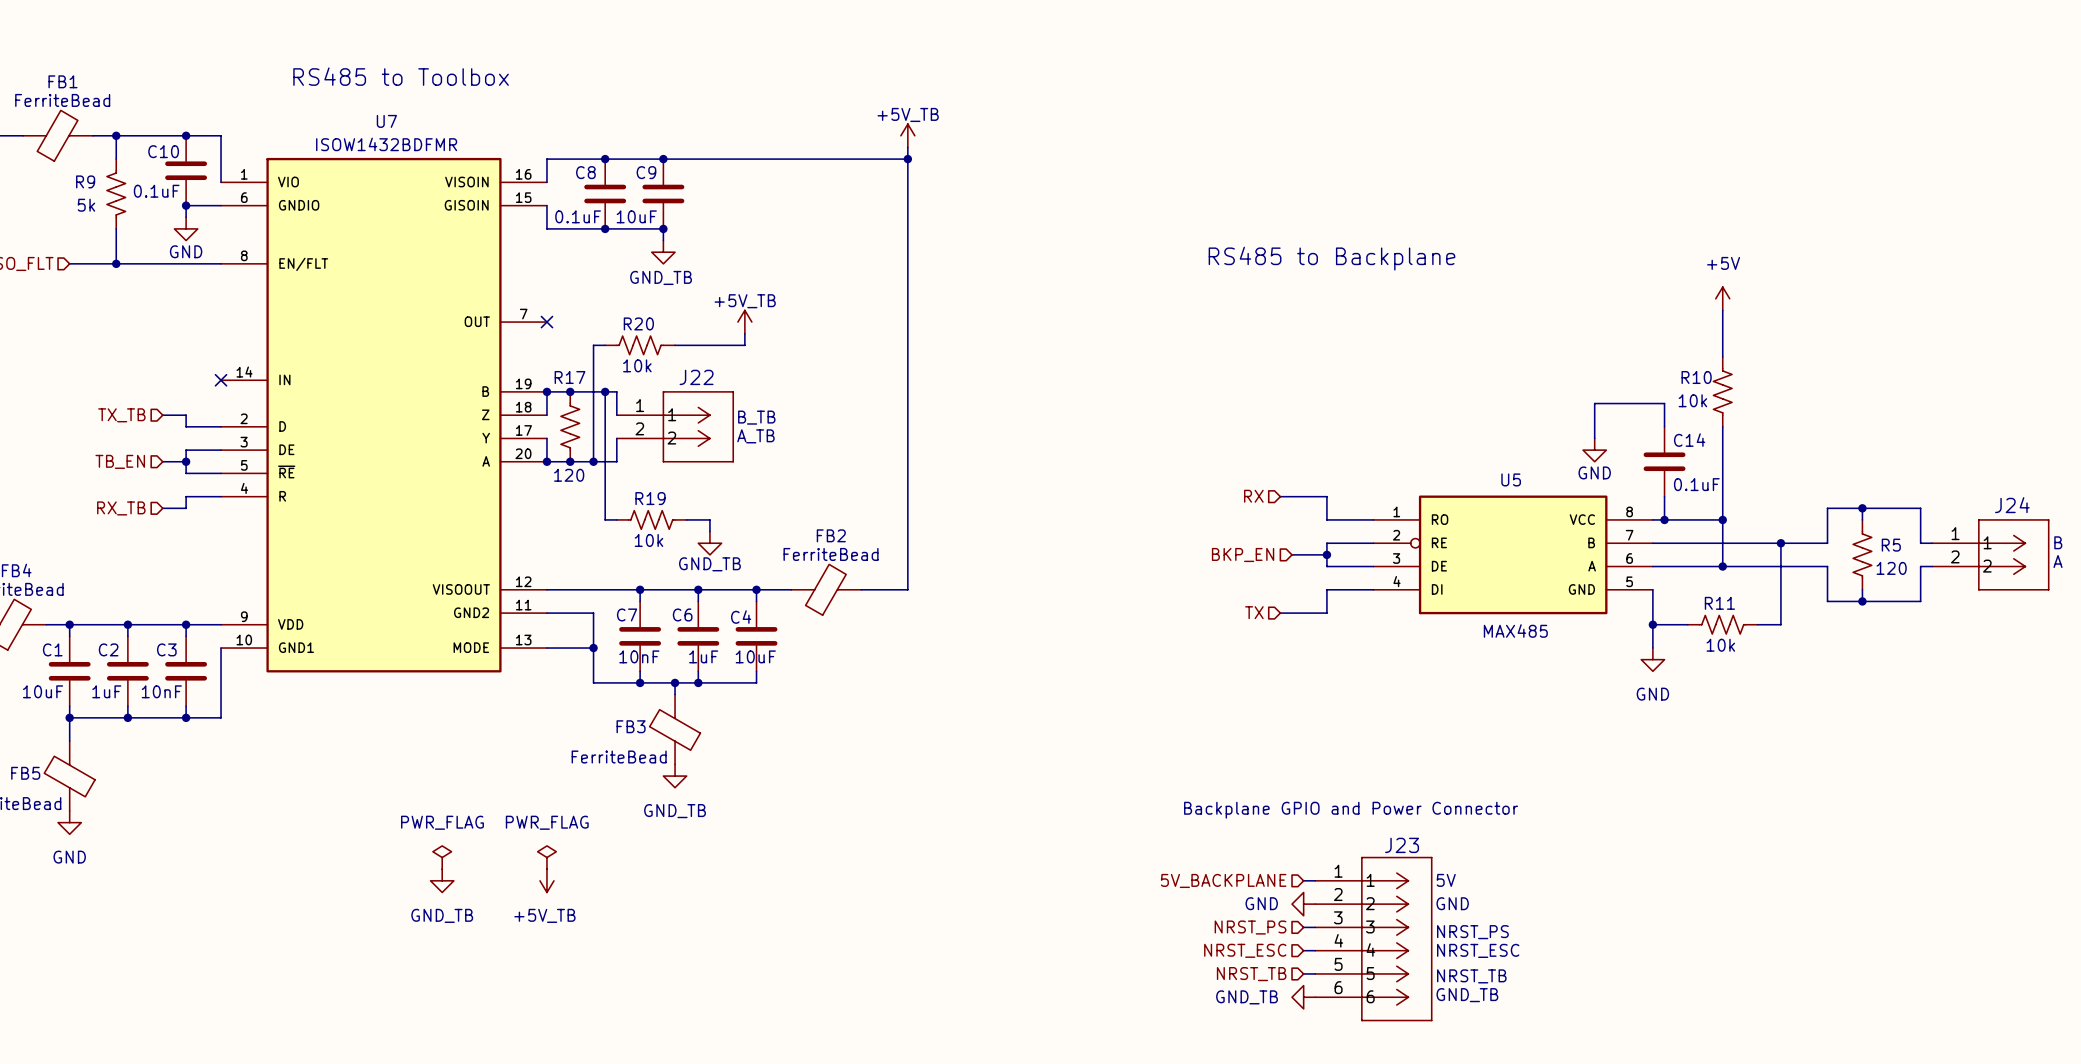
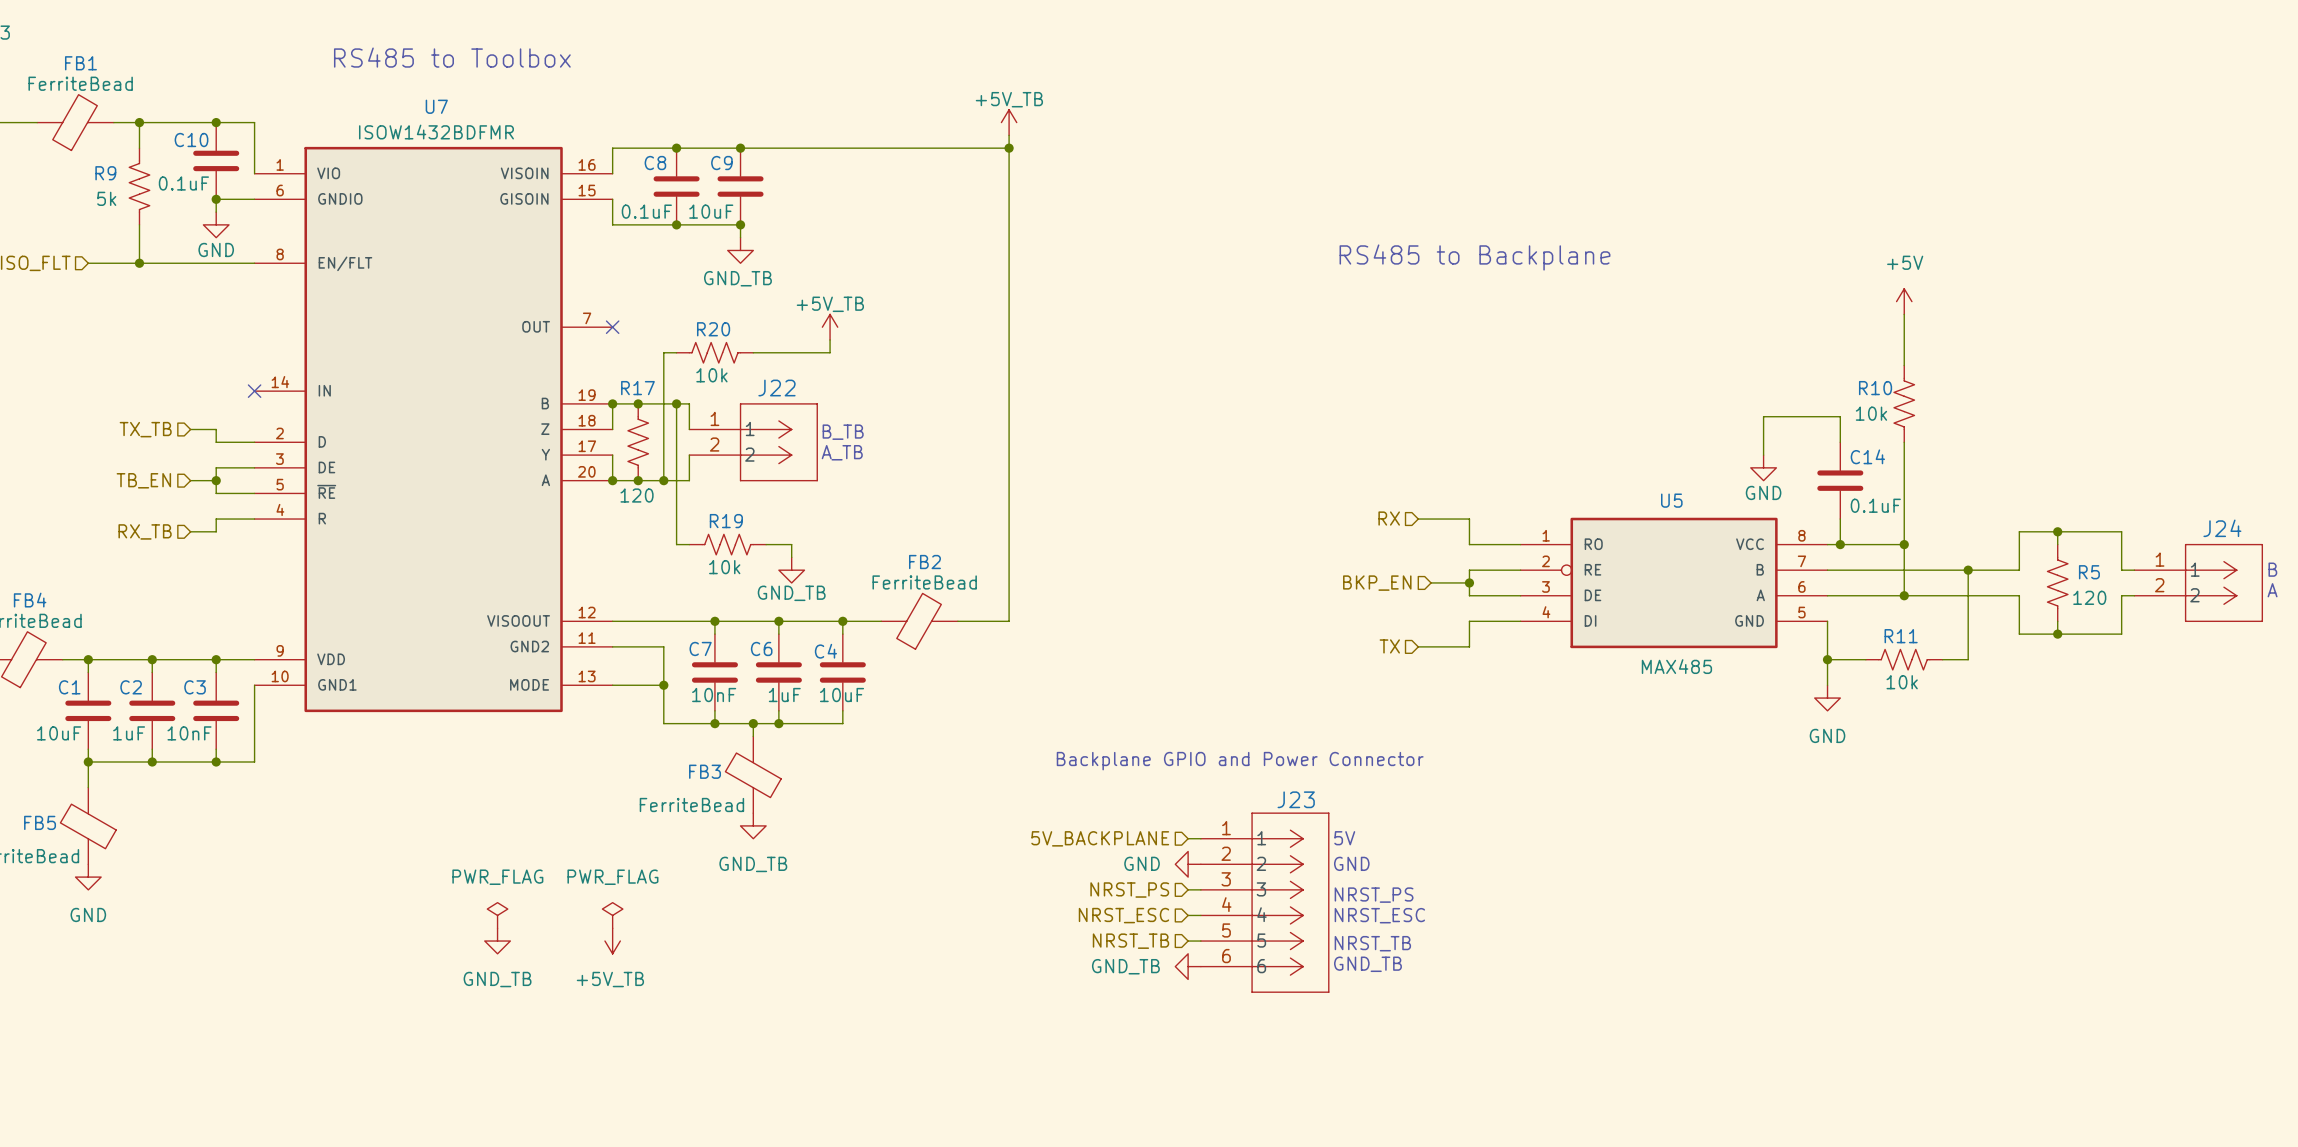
text: none -> Backplane GPIO and Power Connector (1240, 761)
hierarchical label: none -> 5V_BACKPLANE (1100, 838)
wire: none -> (1188, 838) (1200, 838)
text: none -> 5V (1344, 838)
power symbol: none -> GND (1188, 864)
text: none -> GND (1351, 863)
text: Backplane GPIO and Power Connector (1351, 810) -> none
hierarchical label: none -> NRST_PS (1129, 890)
wire: none -> (1188, 889) (1200, 889)
text: none -> NRST_PS (1374, 895)
hierarchical label: none -> NRST_ESC (1123, 915)
wire: none -> (1188, 915) (1200, 915)
text: none -> NRST_ESC (1379, 915)
hierarchical label: none -> NRST_TB (1130, 941)
wire: none -> (1188, 941) (1200, 941)
hierarchical label: 5V_BACKPLANE (1223, 880) -> none
wire: (1303, 880) (1315, 880) -> none
text: 5V (1446, 880) -> none
text: none -> NRST_TB (1372, 943)
text: none -> GND_TB (1367, 964)
text: GND (1452, 903) -> none
power symbol: none -> GND_TB (1188, 966)
power symbol: GND (1303, 904) -> none
hierarchical label: NRST_PS (1250, 927) -> none
wire: (1303, 927) (1315, 927) -> none
text: NRST_PS (1472, 932) -> none
J23 position: (1373, 939) -> (1265, 902)
hierarchical label: NRST_ESC (1245, 950) -> none
wire: (1303, 950) (1315, 950) -> none
text: NRST_ESC (1478, 950) -> none
wire: (1303, 973) (1315, 973) -> none
hierarchical label: NRST_TB (1251, 974) -> none
text: NRST_TB (1471, 976) -> none
text: GND_TB (1467, 995) -> none
power symbol: GND_TB (1303, 997) -> none

